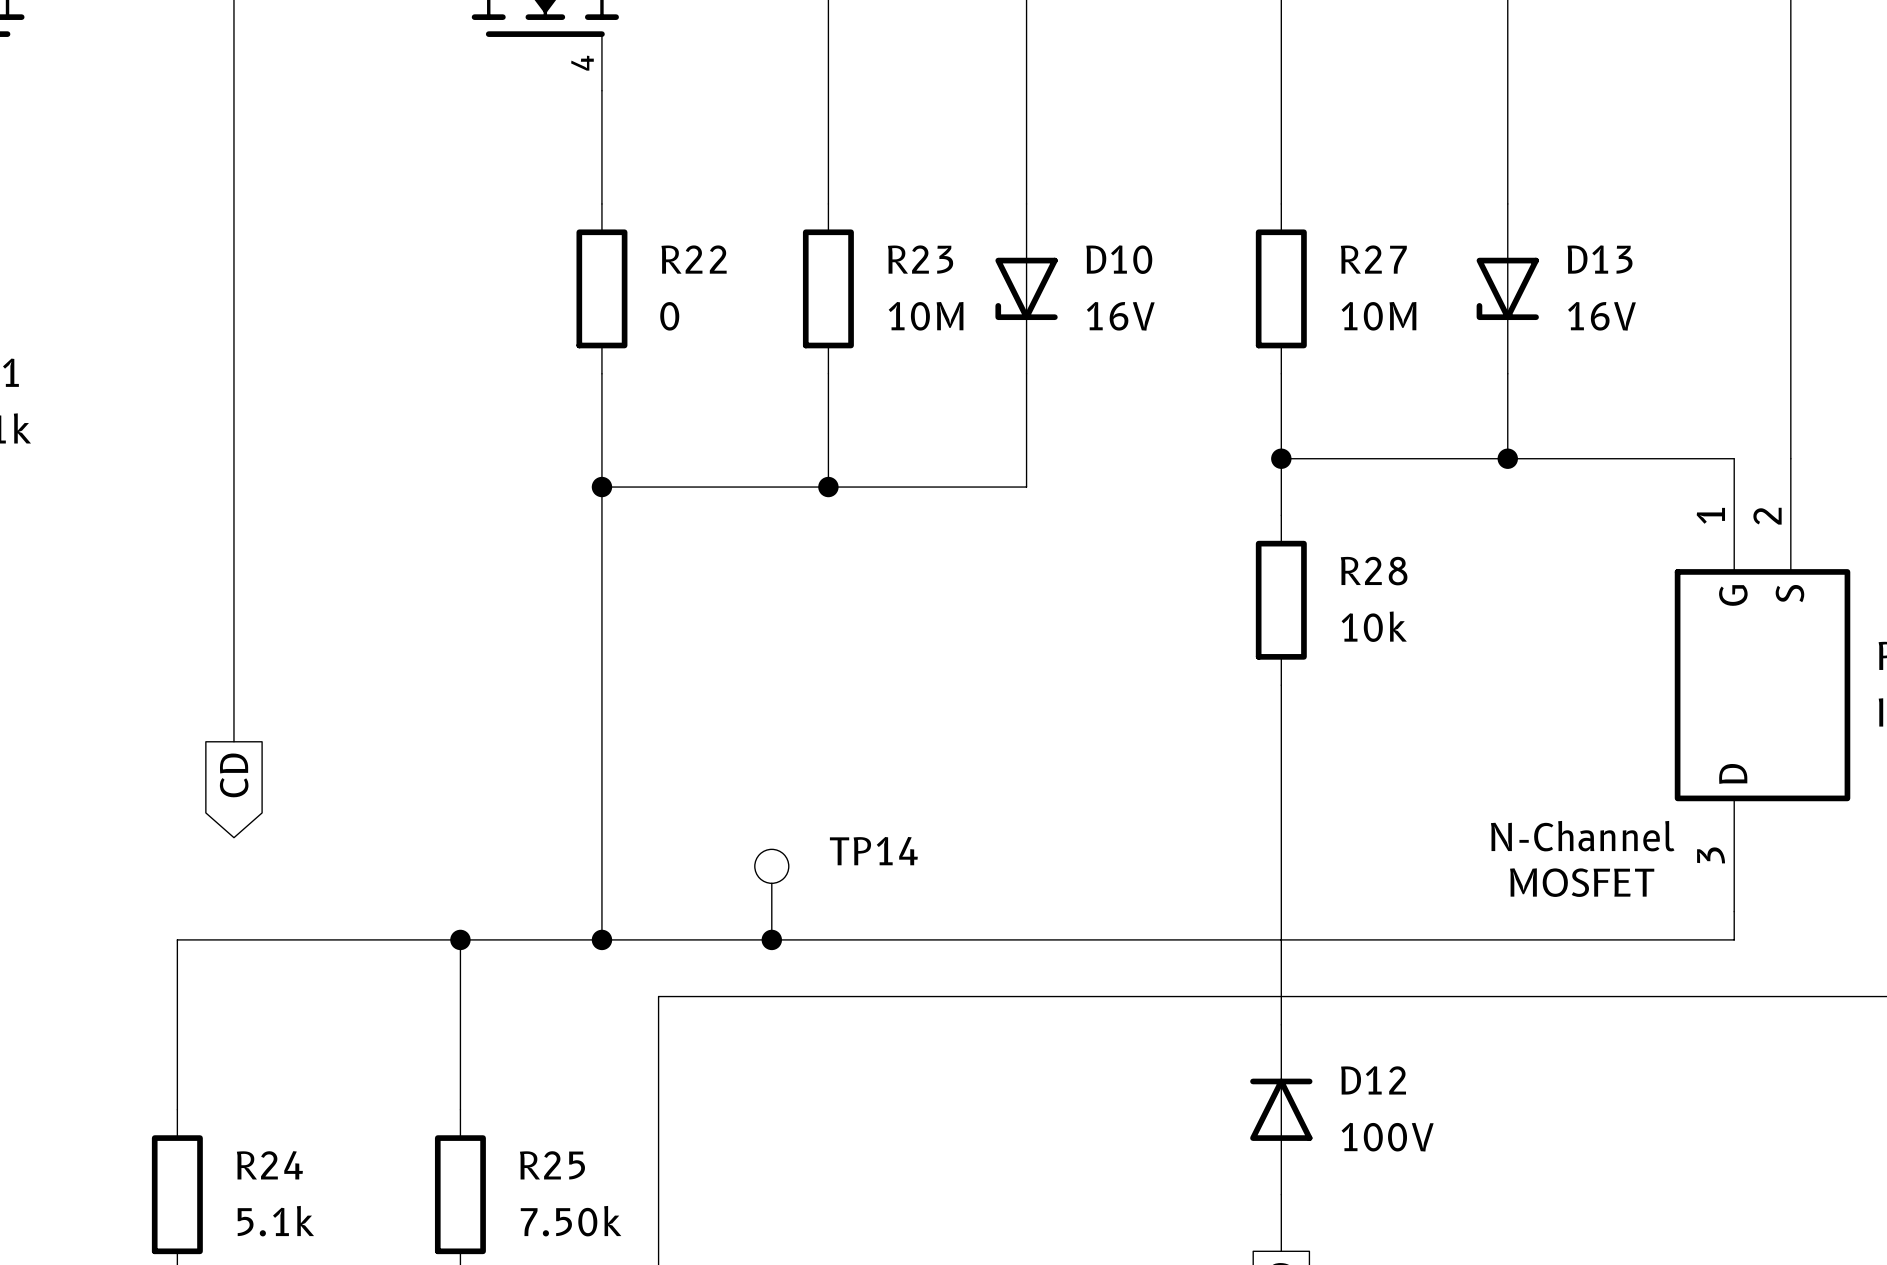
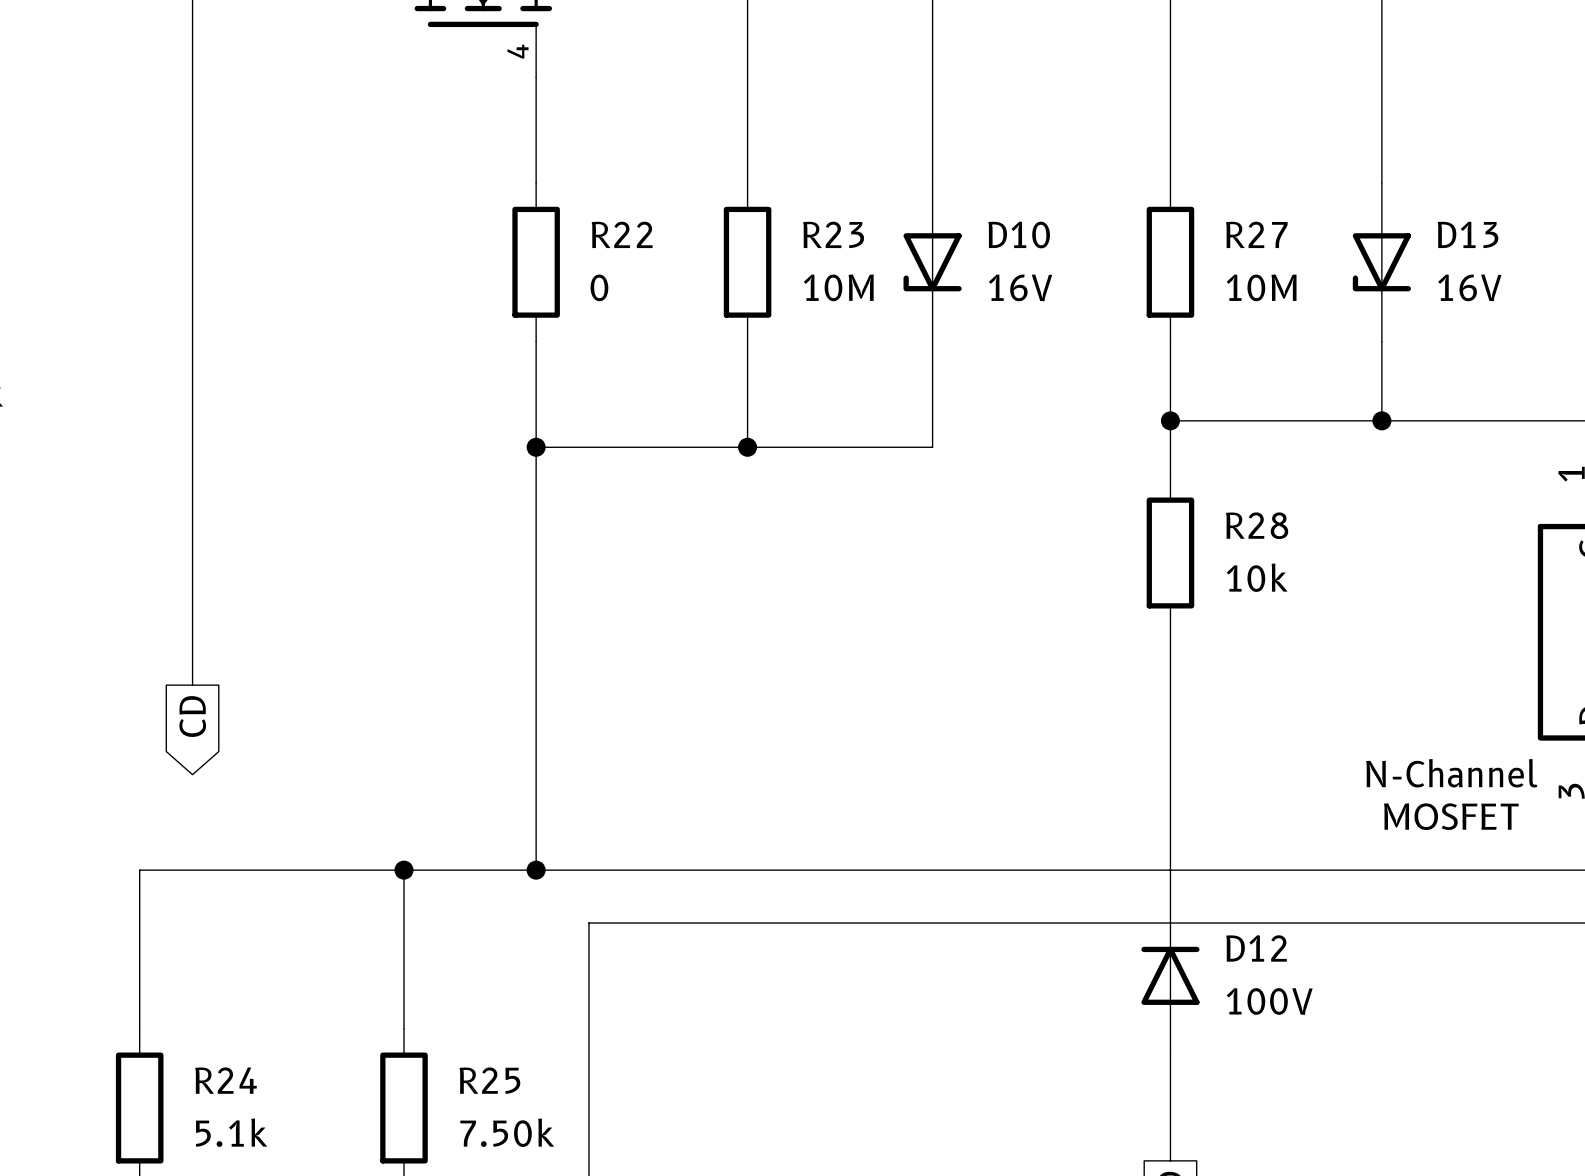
TP14: (771, 894) -> none
junction: (771, 939) -> none
D12 position: (1281, 1109) -> (1170, 975)

